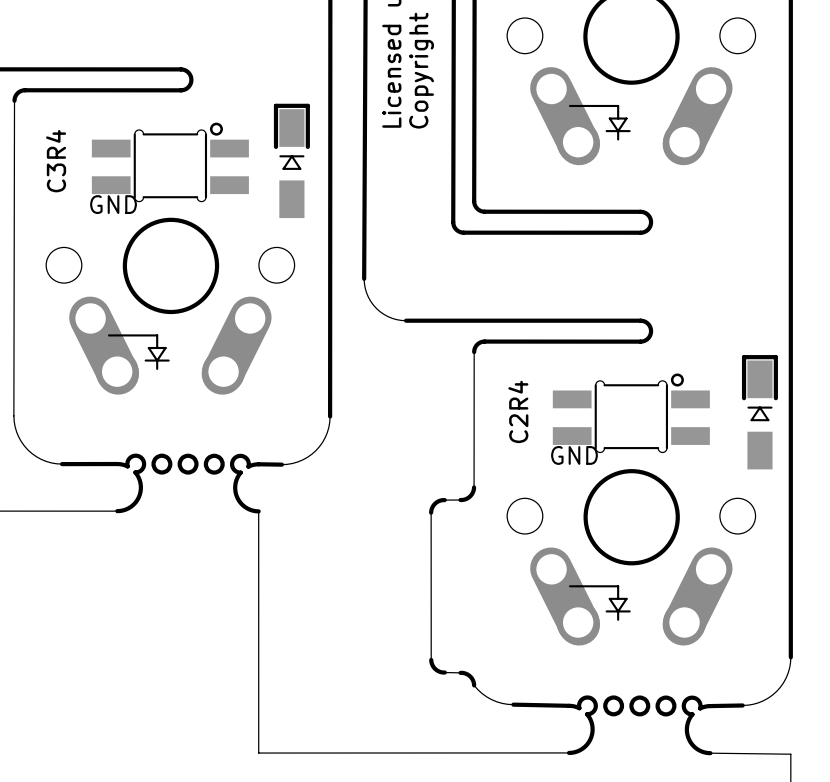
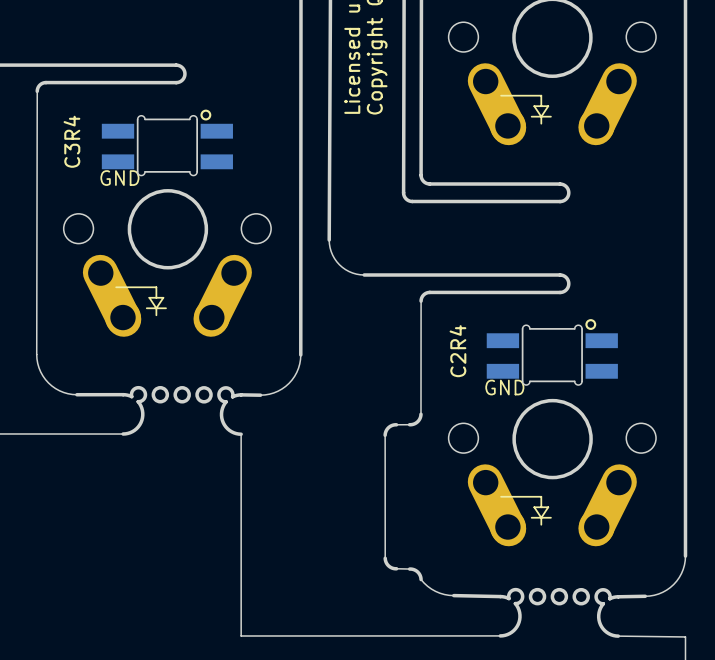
part: (291, 160) -> none
part: (759, 412) -> none

